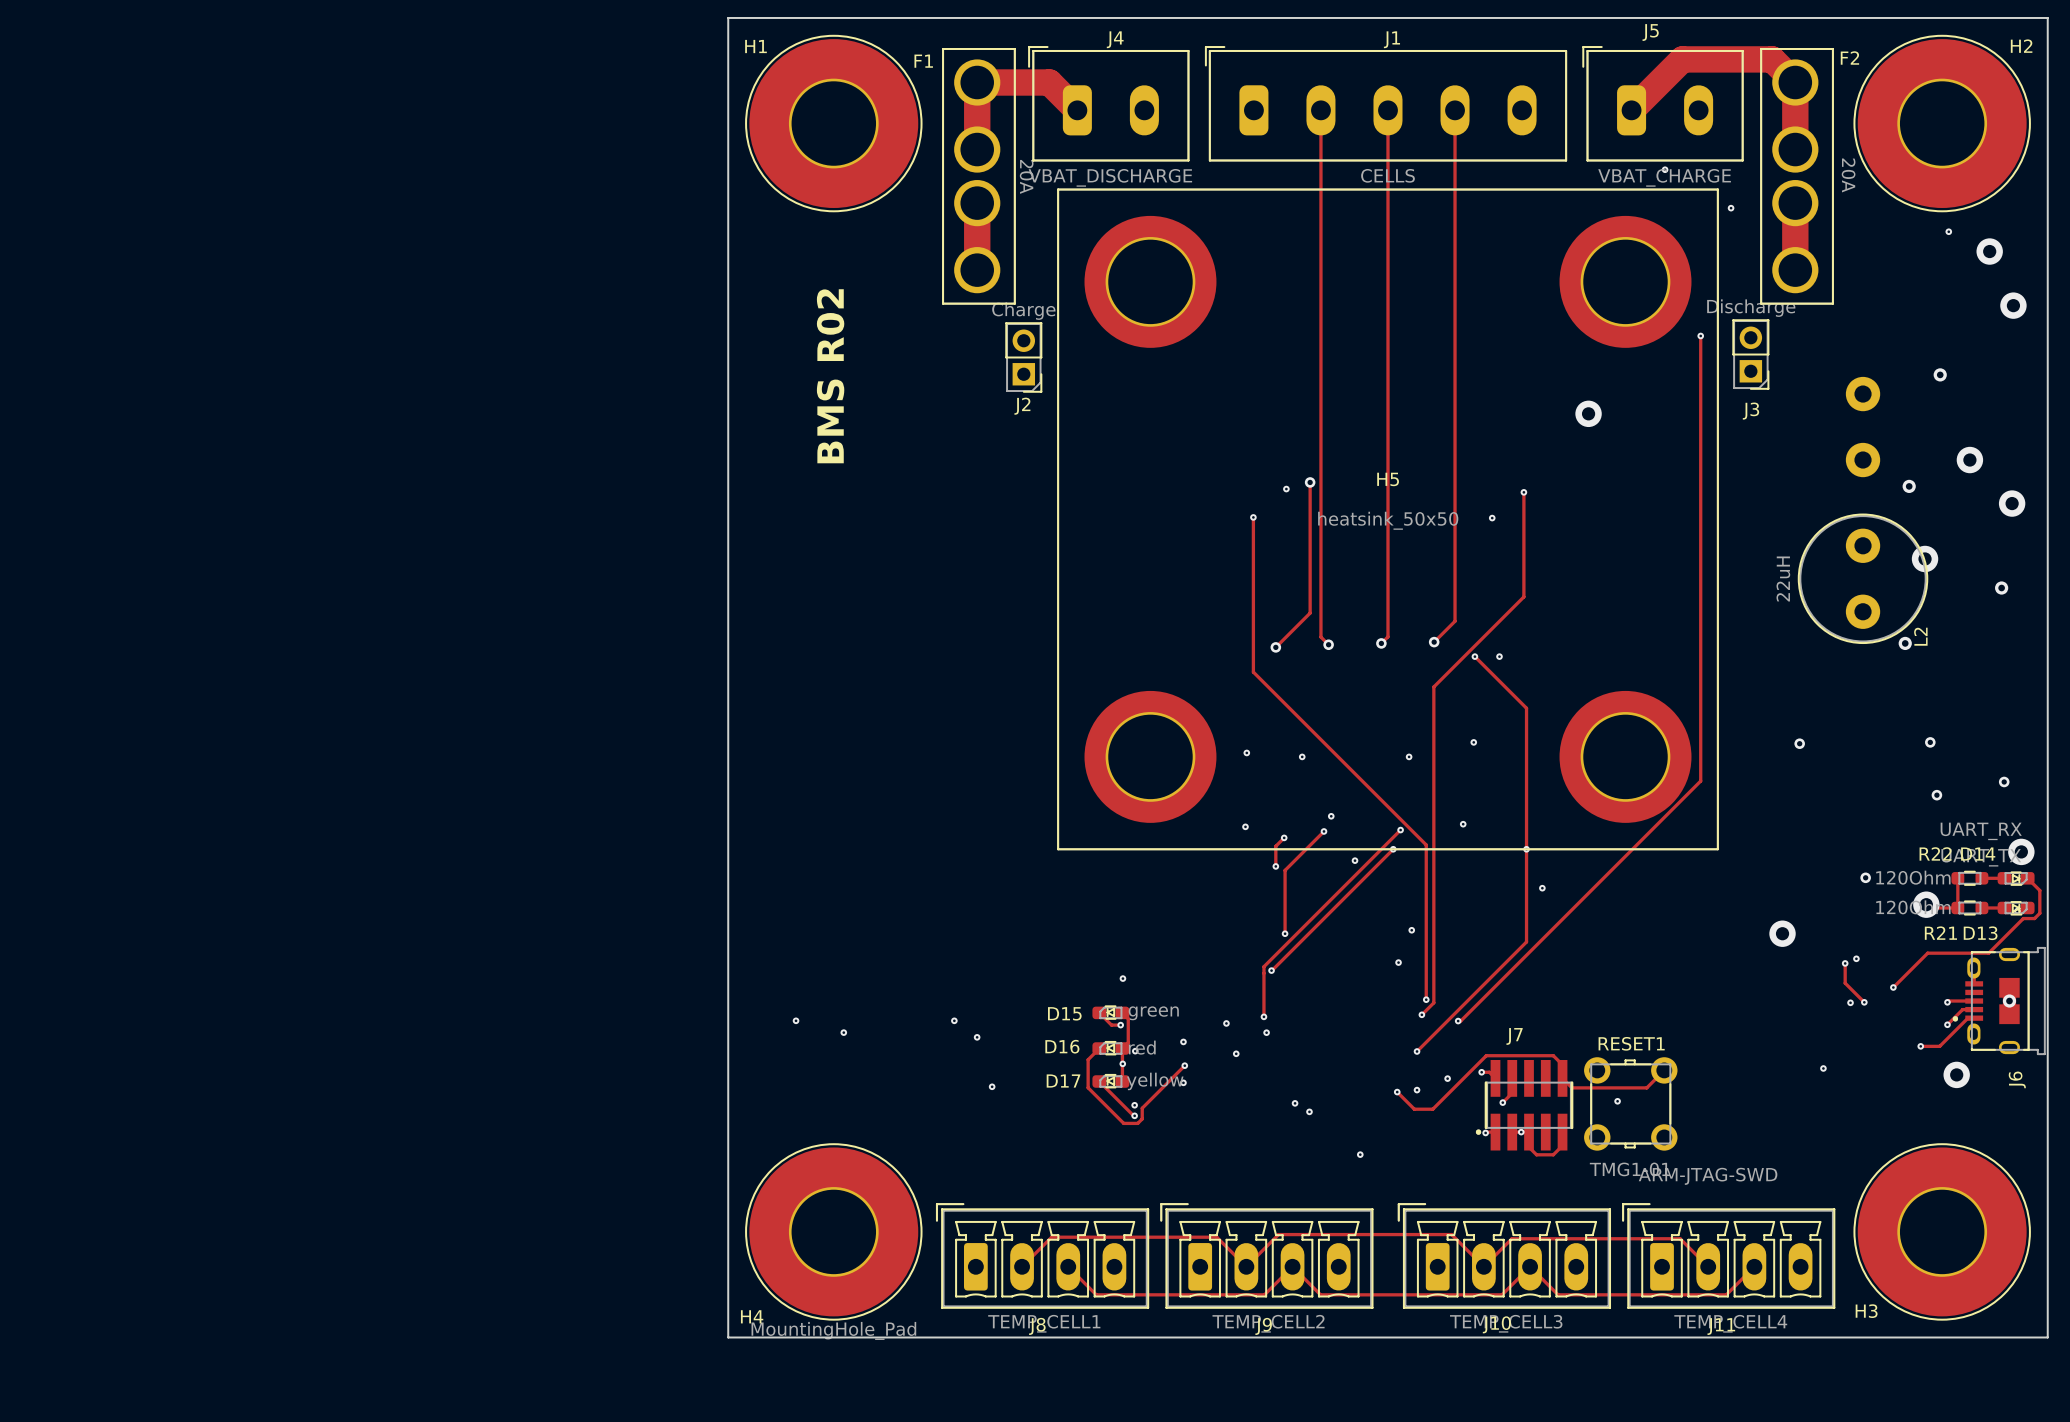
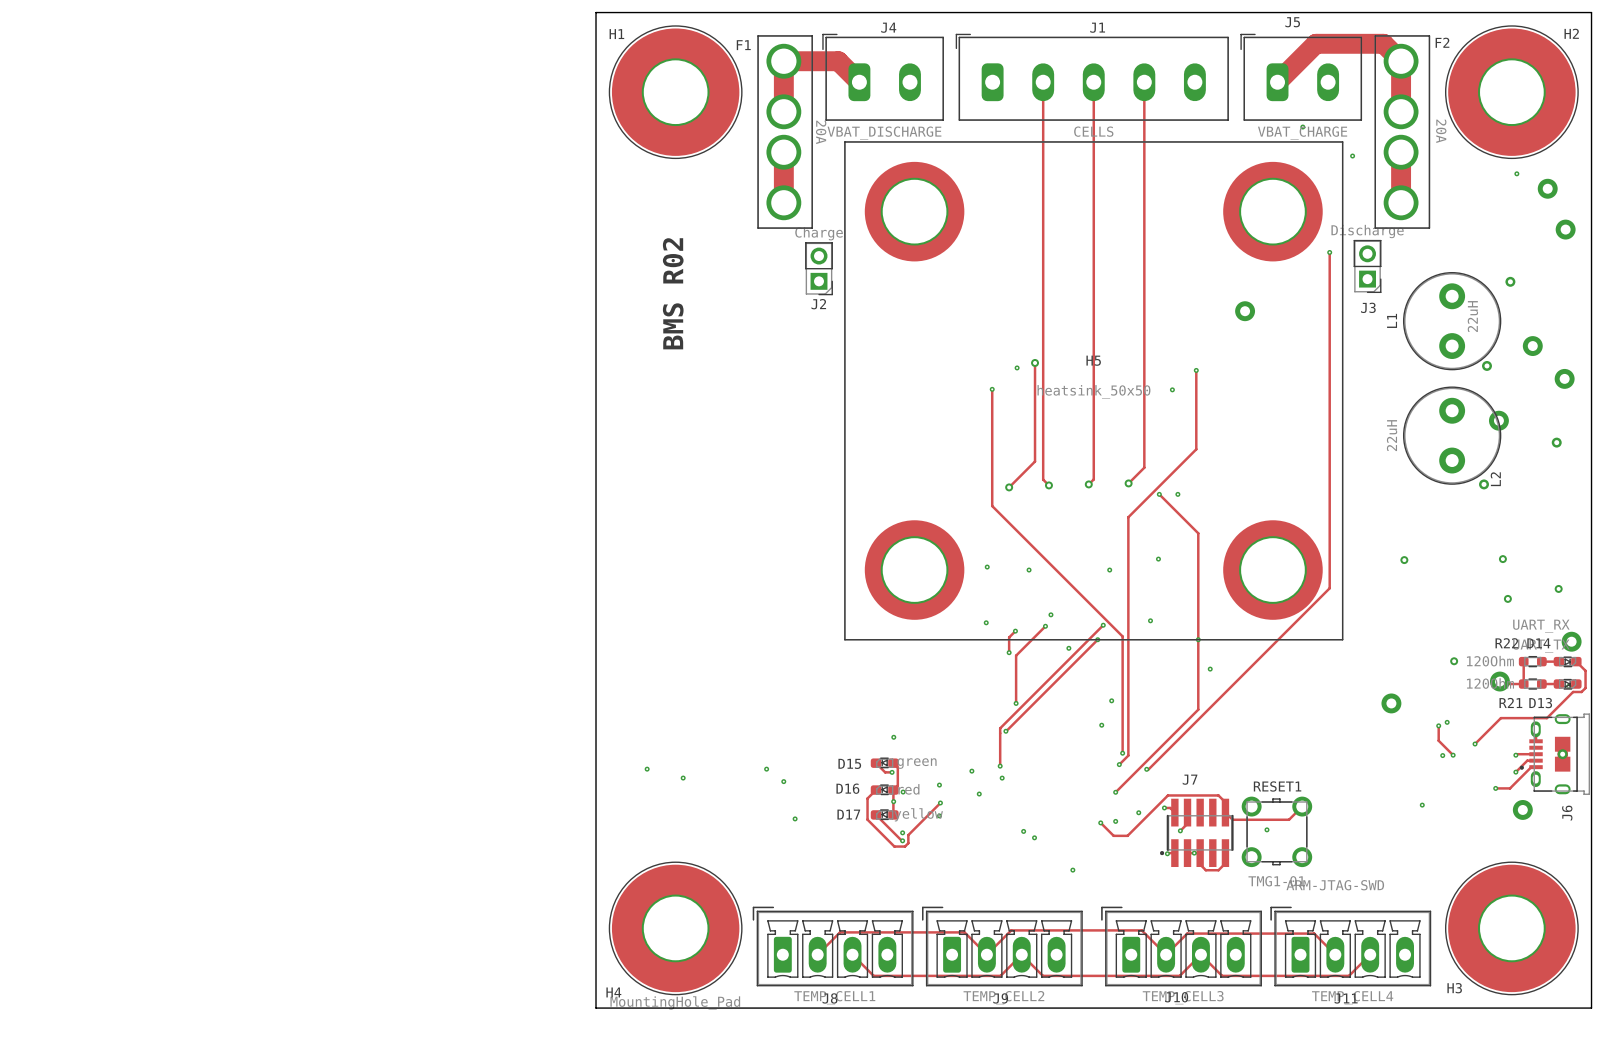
L1 side: bottom (1863, 427) -> top (1452, 321)

